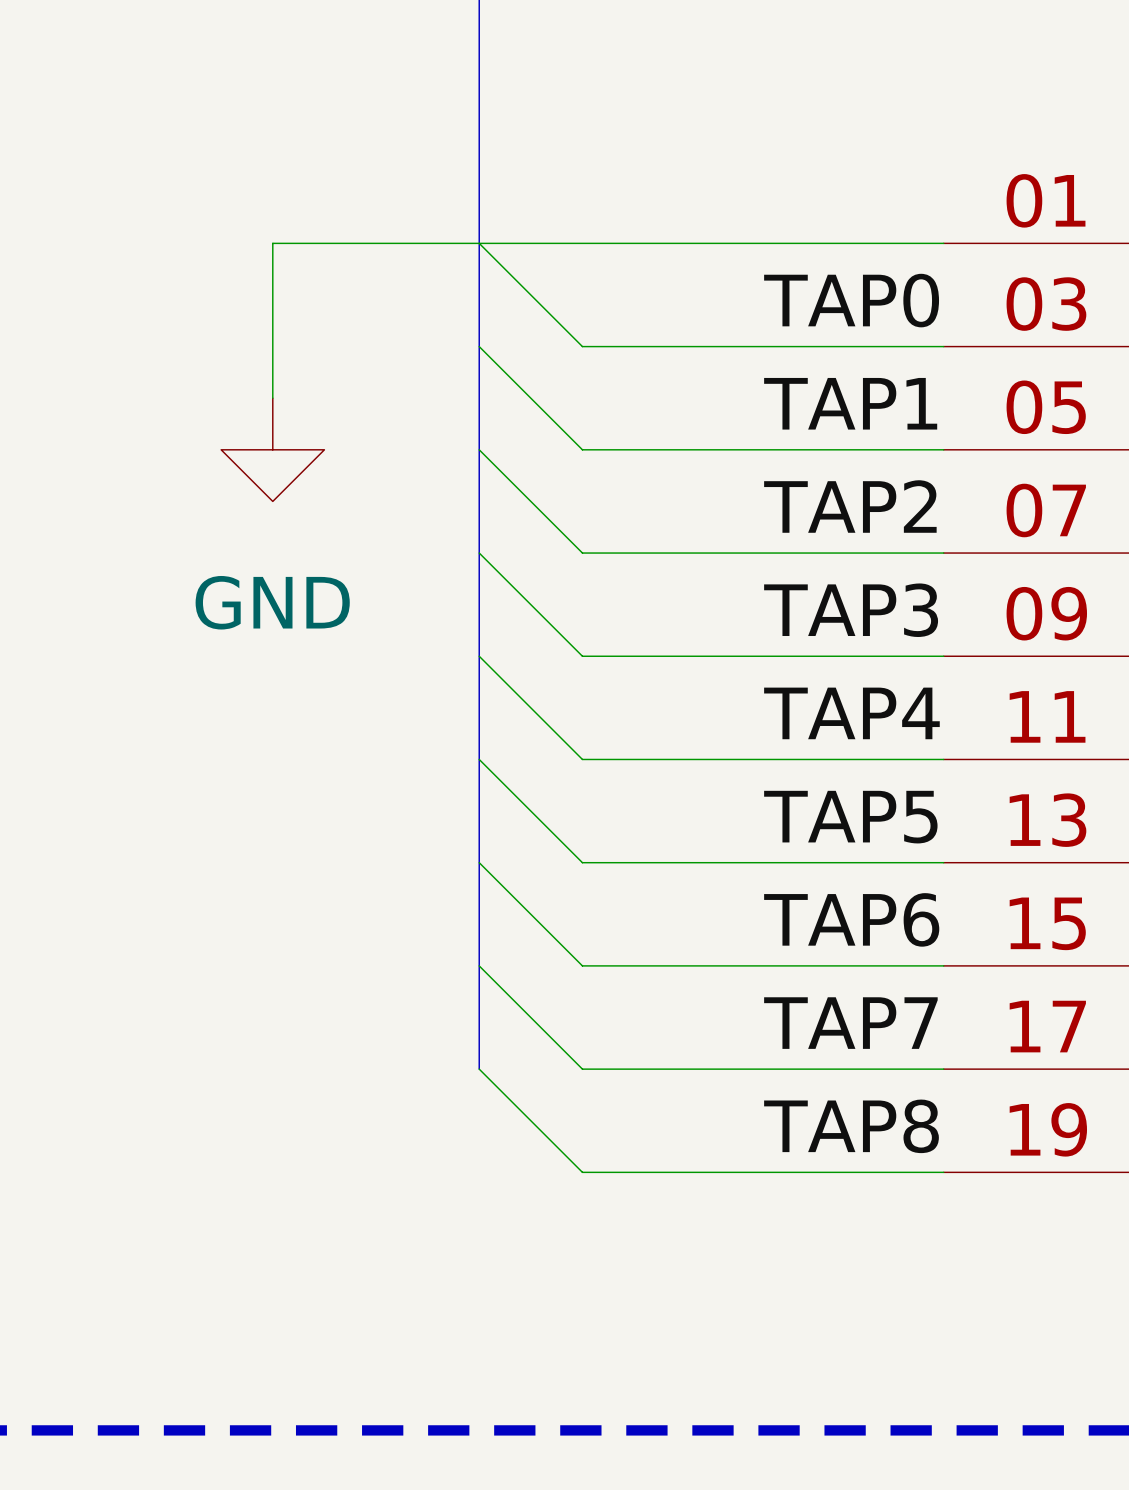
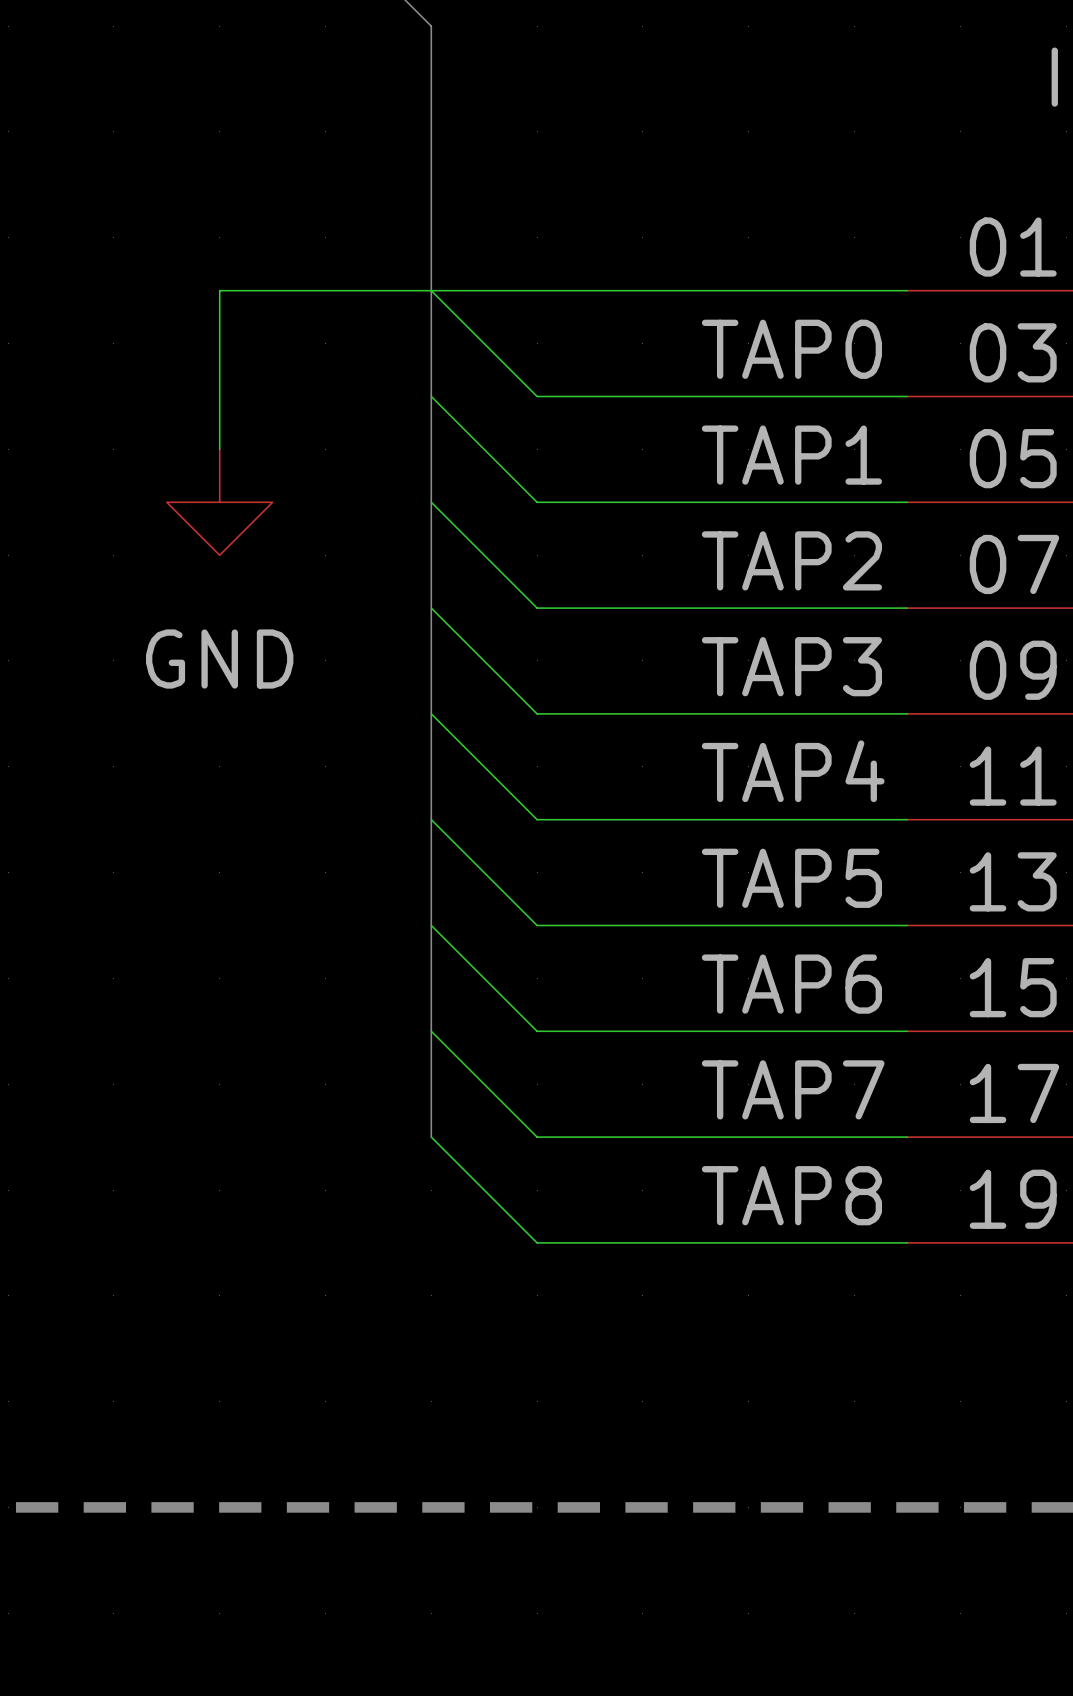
label position: TAP0 (851, 300) -> TAP0 (791, 349)
label position: TAP1 (850, 403) -> TAP1 (791, 455)
label position: TAP2 (850, 506) -> TAP2 (791, 560)
label position: TAP3 (851, 610) -> TAP3 (791, 666)
label position: TAP4 (851, 713) -> TAP4 (793, 771)
label position: TAP5 (850, 817) -> TAP5 (791, 878)
label position: TAP6 (851, 919) -> TAP6 (791, 984)
label position: TAP7 (850, 1023) -> TAP7 (793, 1089)
label position: TAP8 (851, 1126) -> TAP8 (791, 1195)

